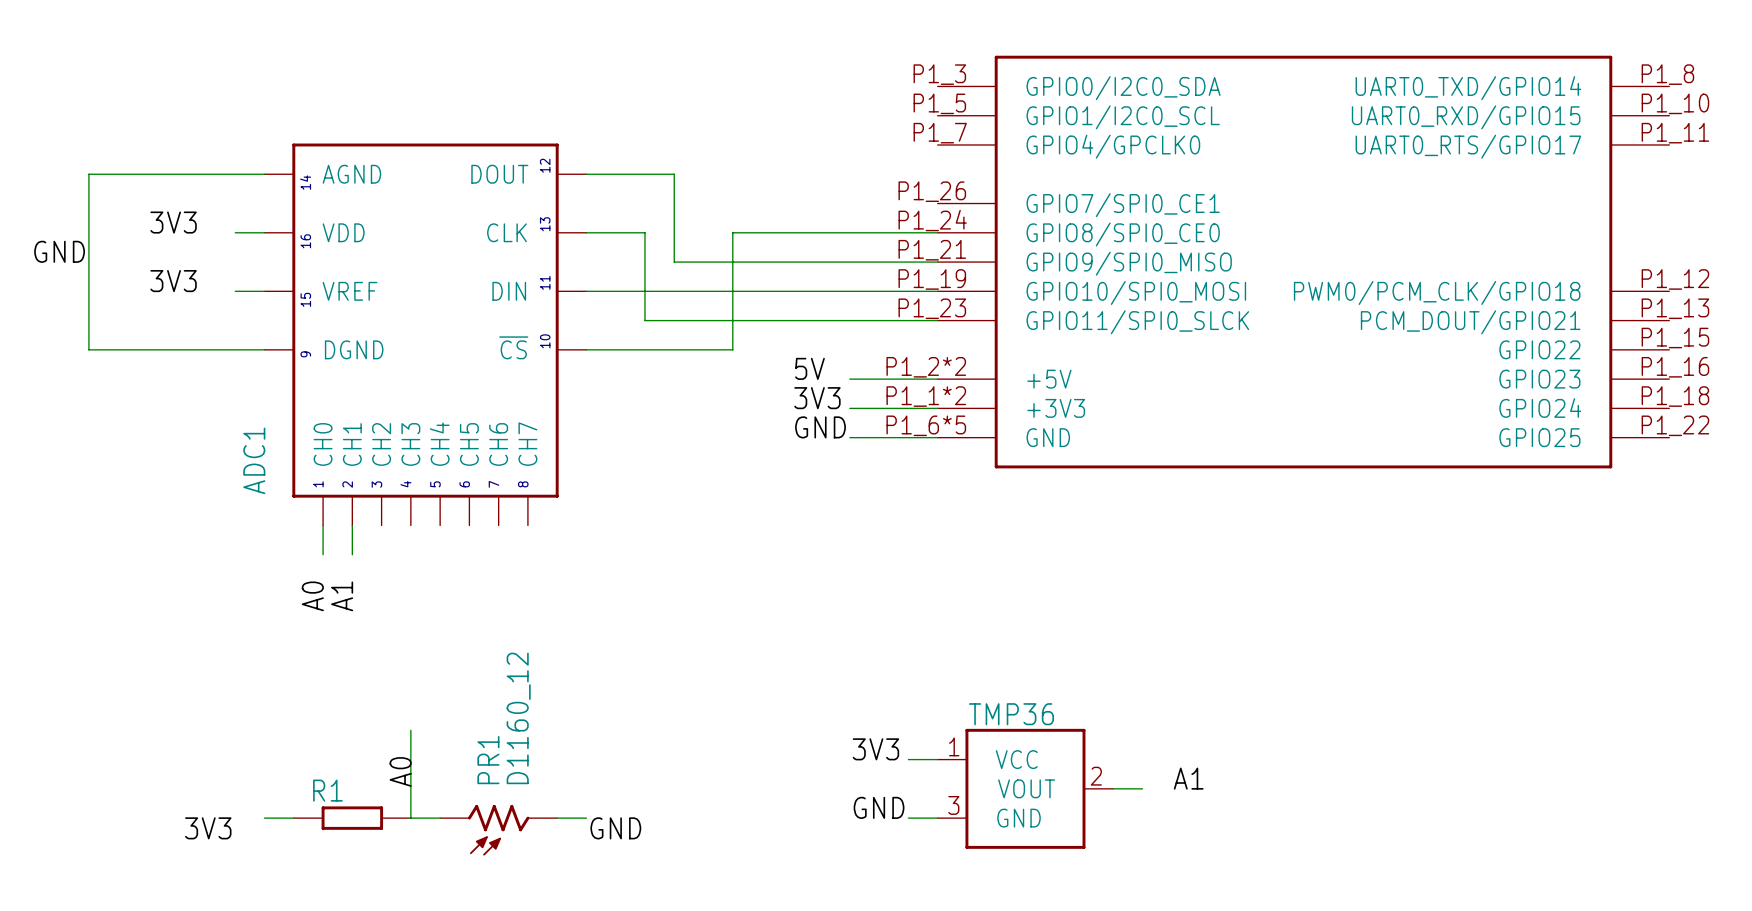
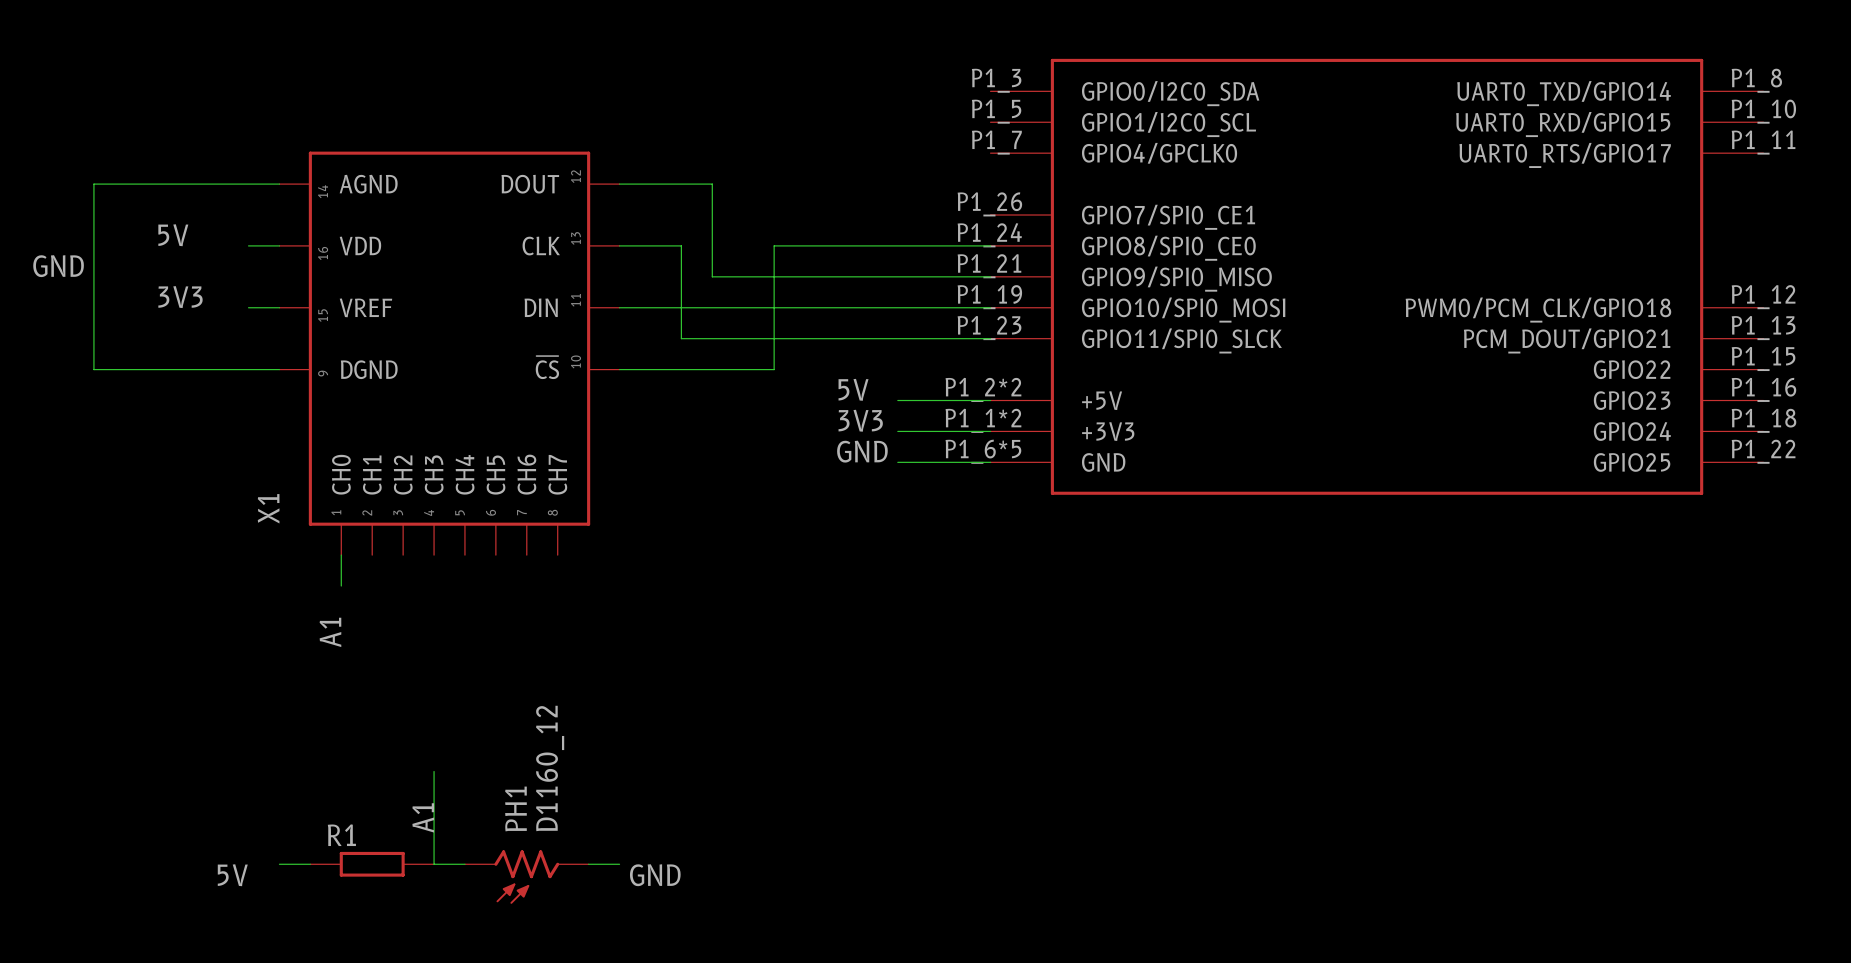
label: 3V3 (173, 222) -> 5V (173, 235)
ADC1 name: ADC1 (254, 460) -> X1 (268, 508)
wire: (352, 525) (352, 554) -> none
label: A0 (312, 596) -> A1 (330, 632)
label: A1 (342, 596) -> none
label: 3V3 (875, 749) -> none
wire: (908, 759) (937, 759) -> none
PR1 name: PR1 (488, 760) -> PH1 (515, 808)
label: A0 (400, 771) -> A1 (423, 817)
label: A1 (1188, 778) -> none
TMP36: (1025, 788) -> none
wire: (1113, 788) (1142, 788) -> none
label: GND (879, 807) -> none
wire: (908, 818) (937, 818) -> none
label: 3V3 (208, 828) -> 5V (232, 875)

